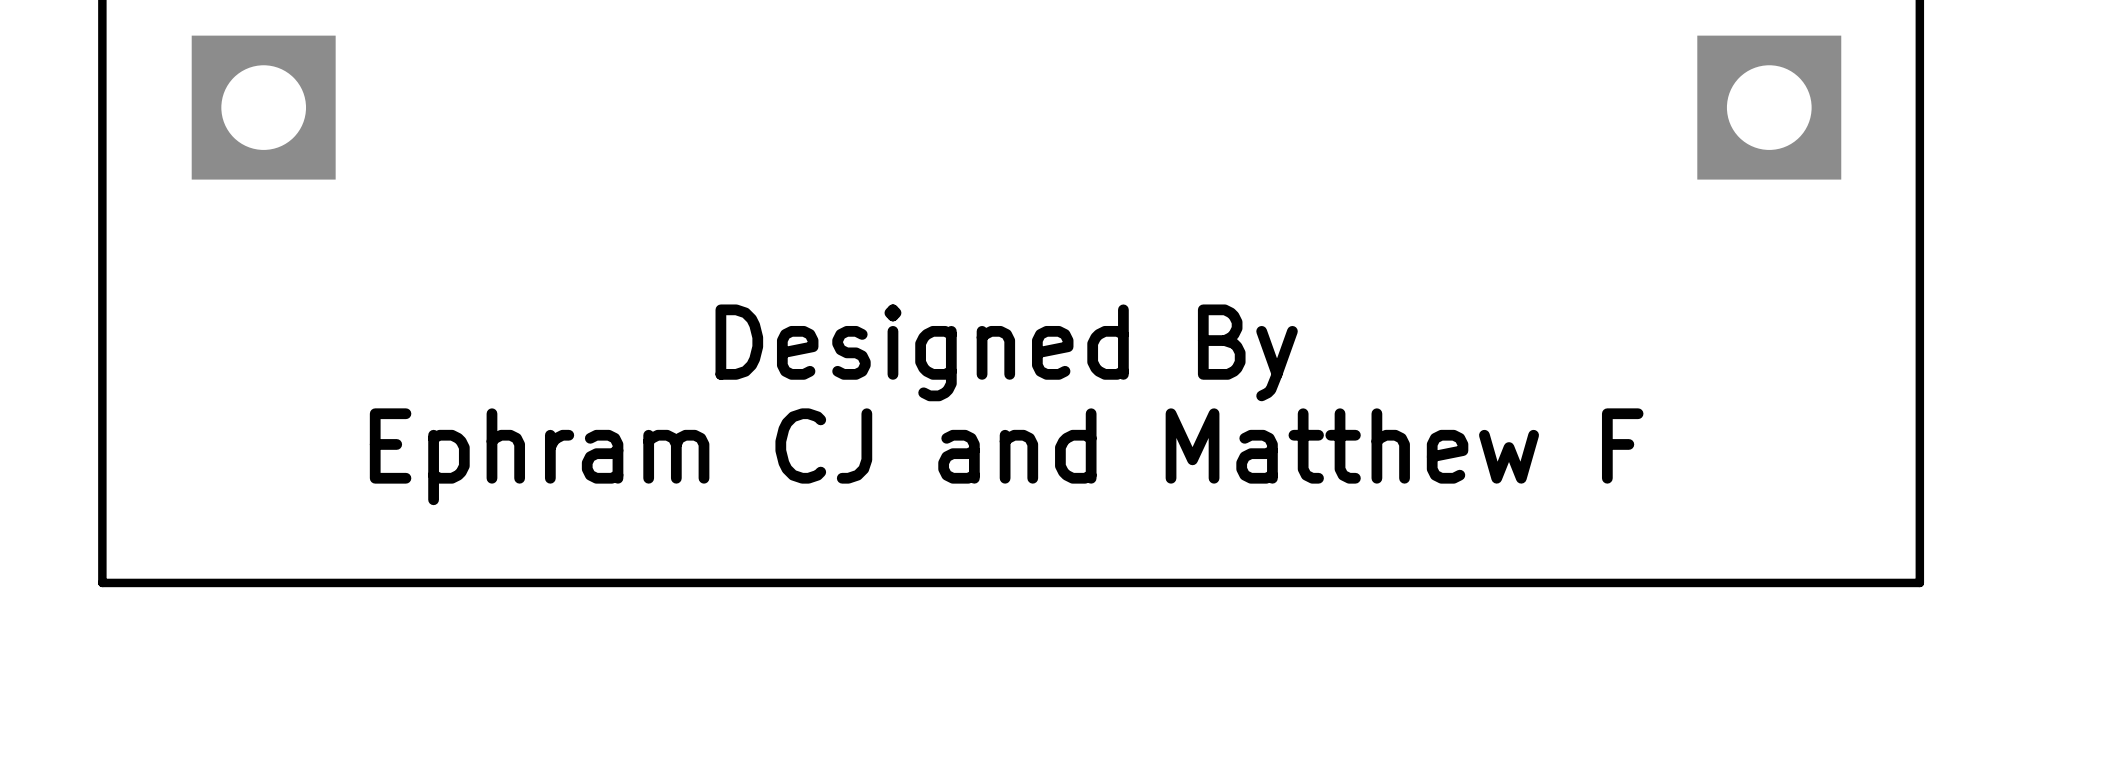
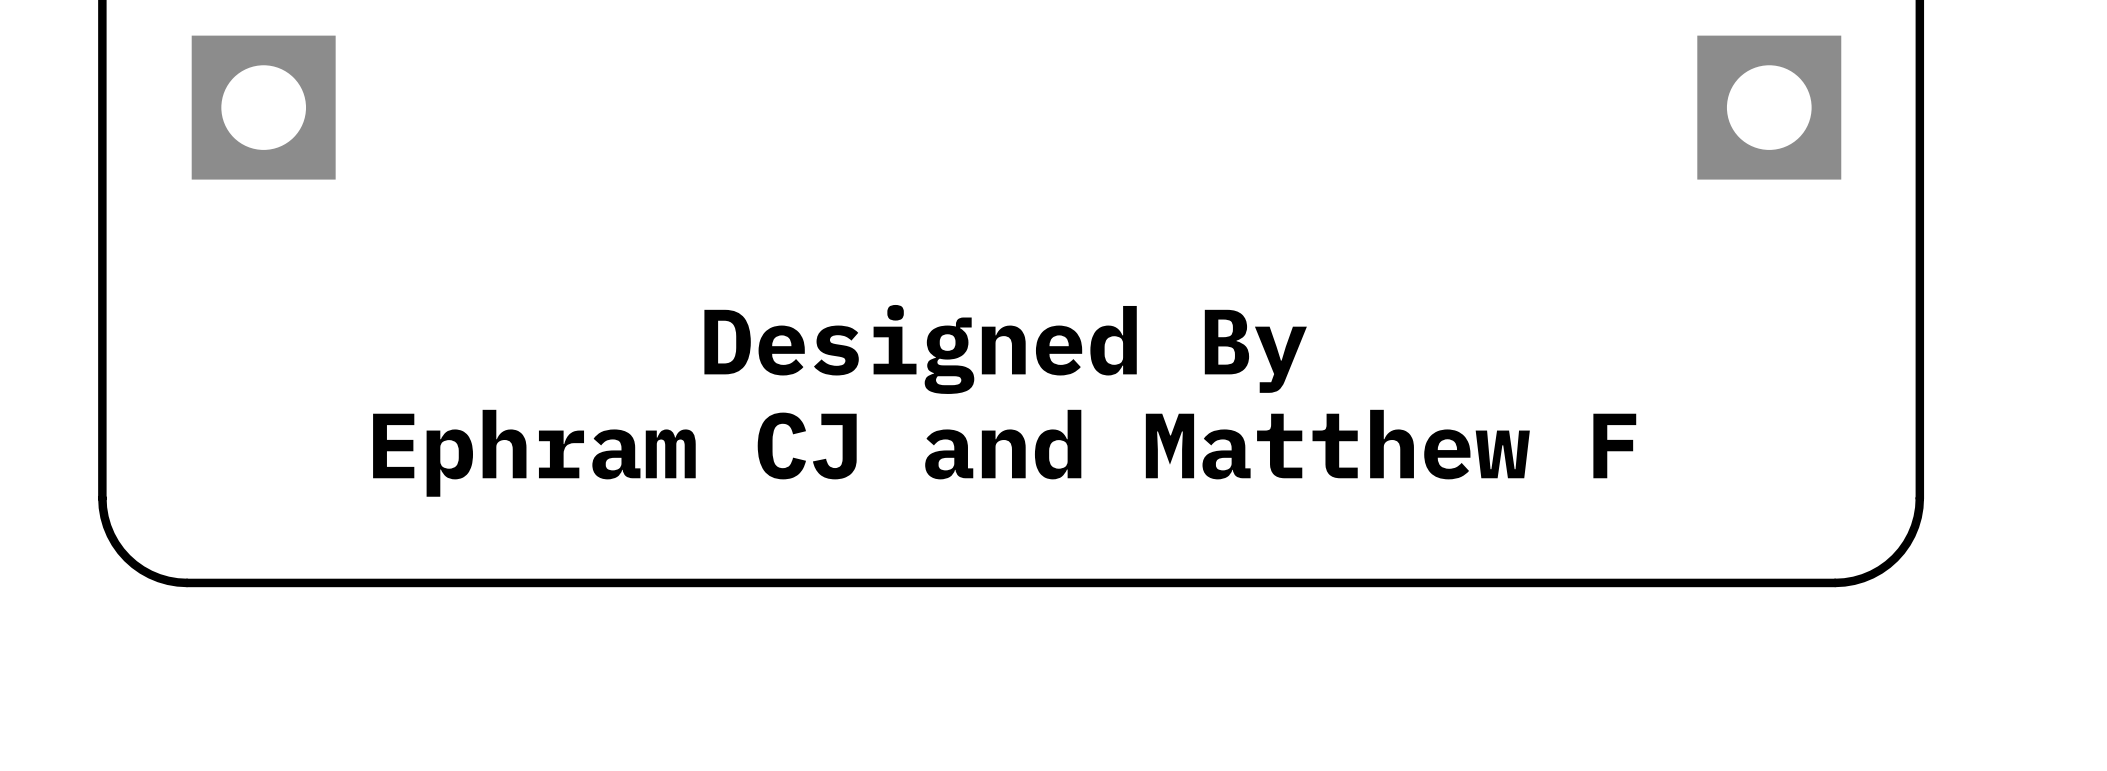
board edge: (102, 498) (102, 582) (187, 582) -> (102, 498) (107, 526) (115, 543) (127, 558) (150, 574) (168, 580) (187, 582)
board edge: (1919, 498) (1919, 582) (1835, 582) -> (1919, 498) (1915, 526) (1906, 543) (1895, 558) (1871, 574) (1854, 580) (1835, 582)

